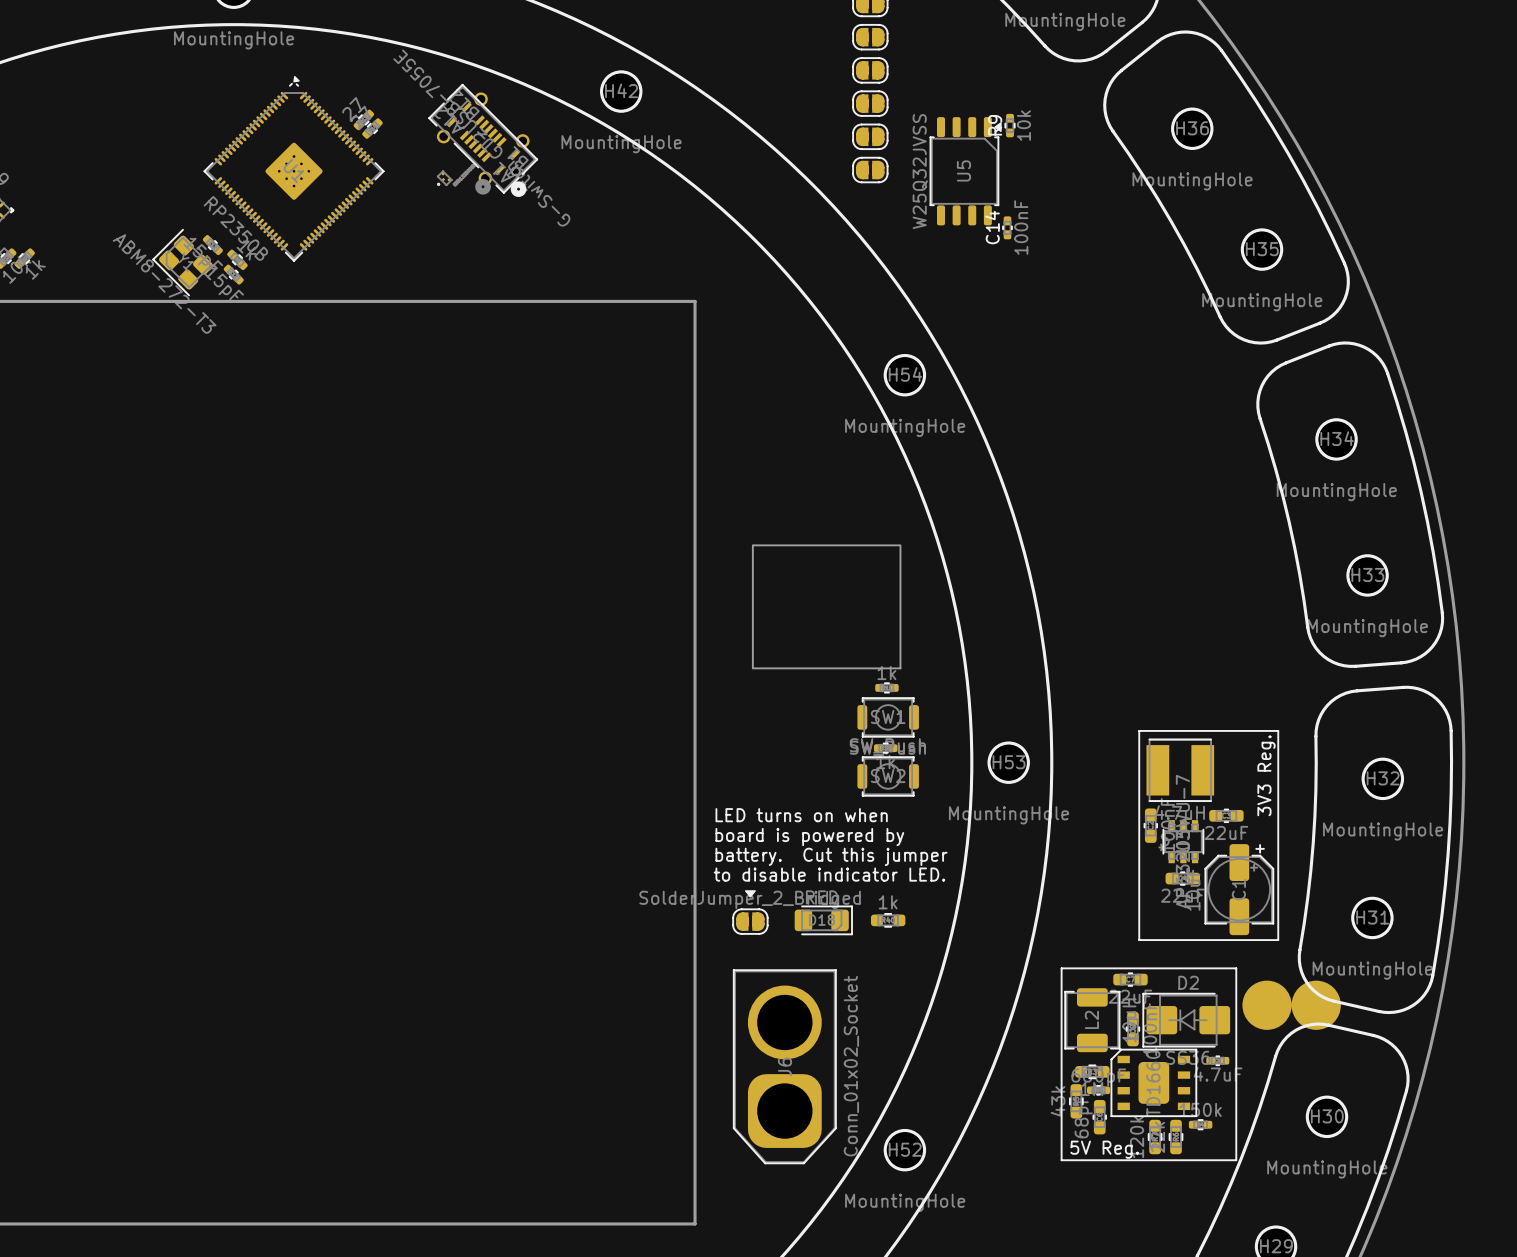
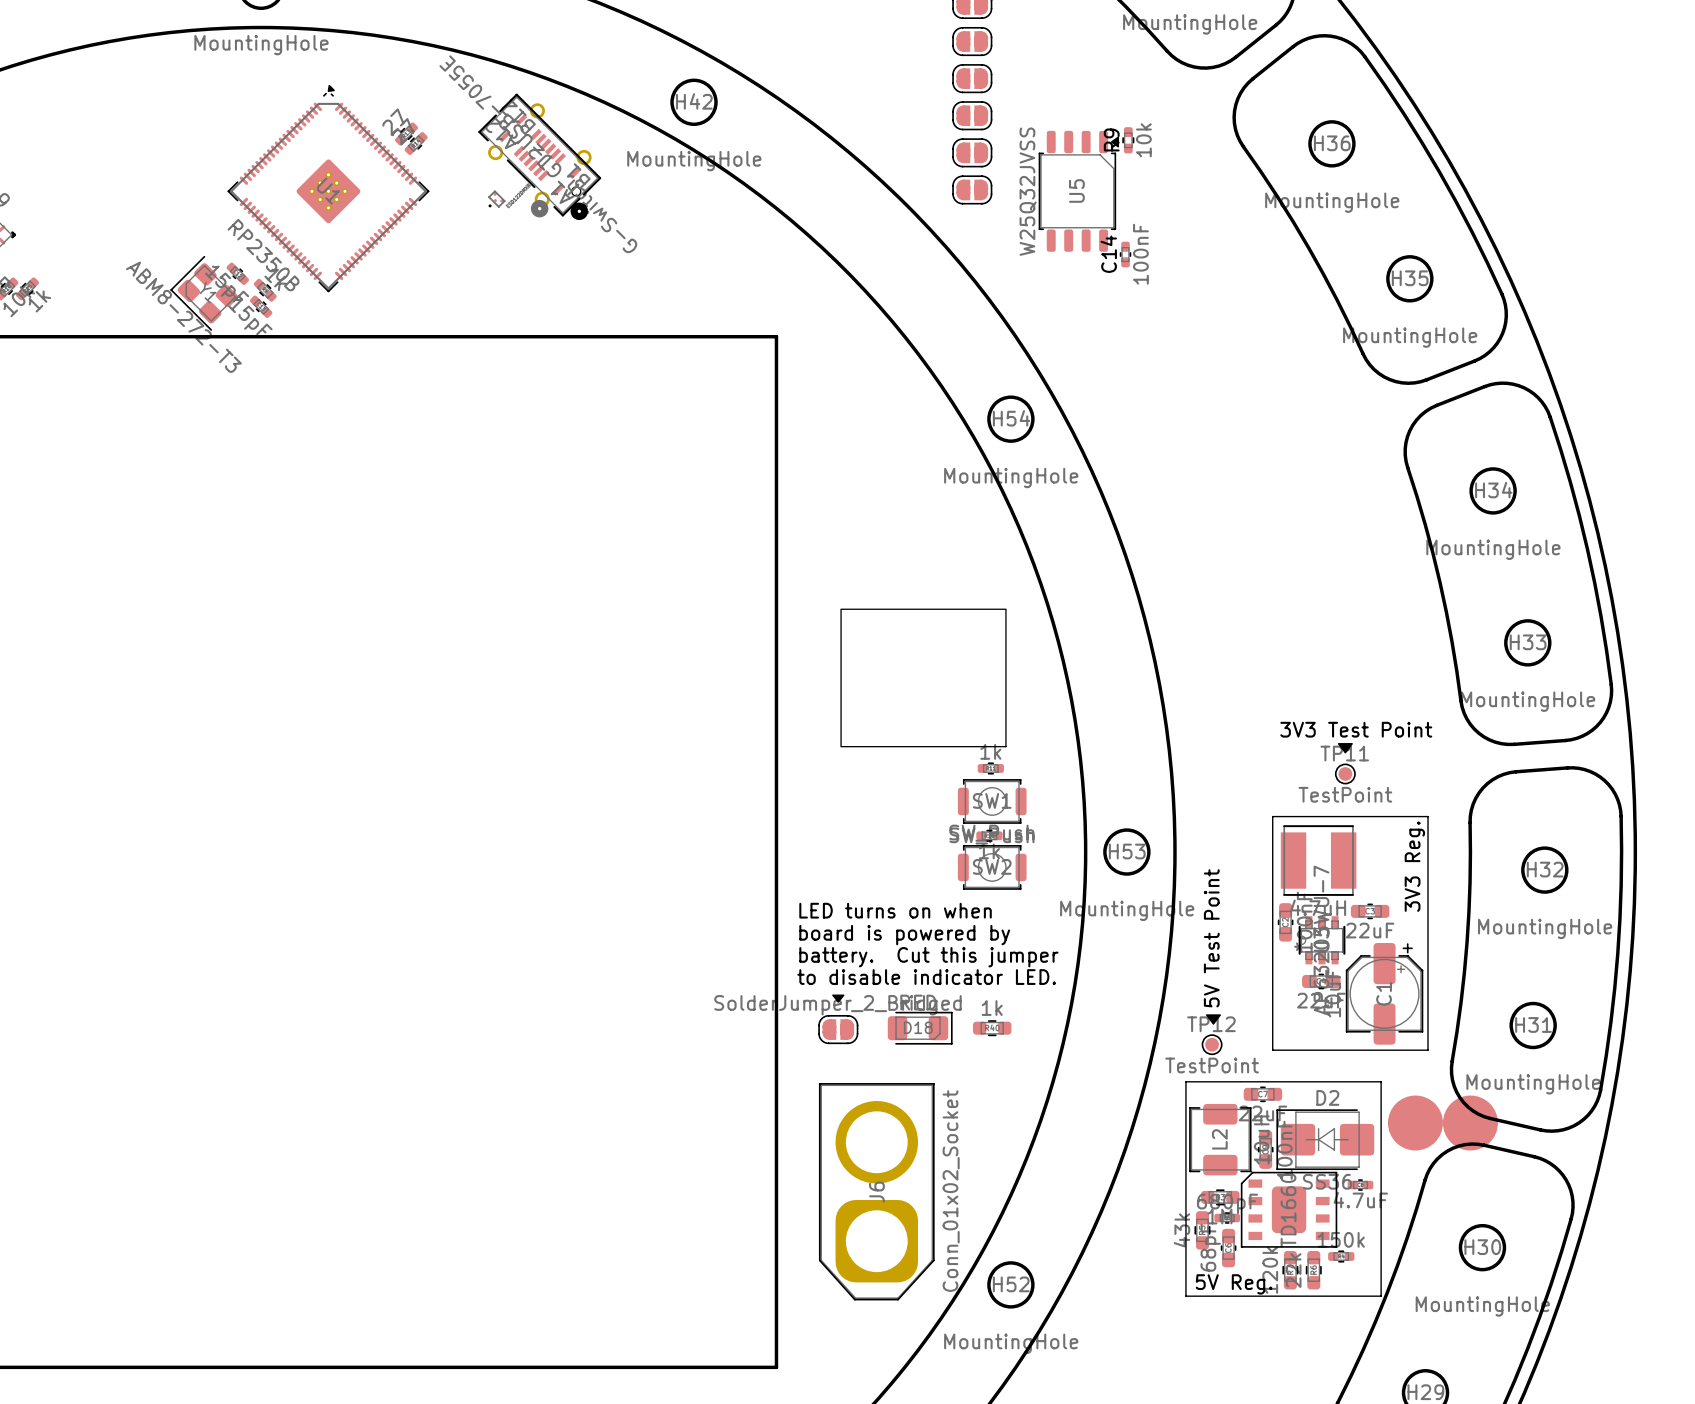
text: none -> 3V3 Test Point (1356, 729)
drawing: none -> [1337, 743, 1353, 754]
TP11: none -> TestPoint (1345, 773)
text: none -> 5V Test Point (1211, 938)
drawing: none -> [1205, 1014, 1222, 1025]
TP12: none -> TestPoint (1212, 1044)

